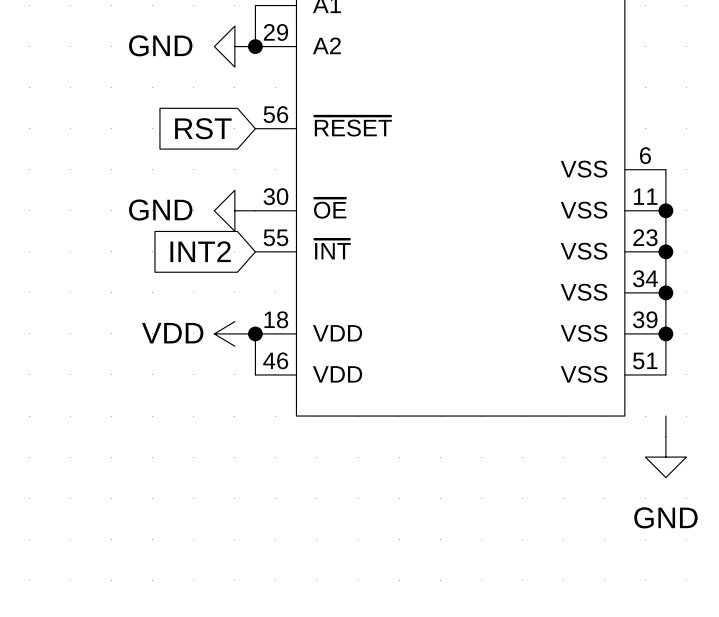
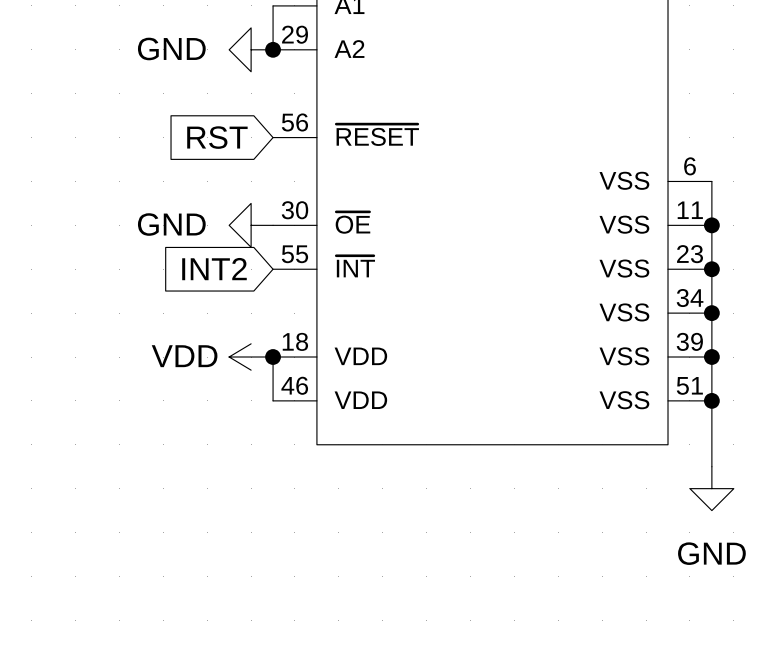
wire: none -> (711, 400) (711, 444)
junction: none -> (711, 400)

